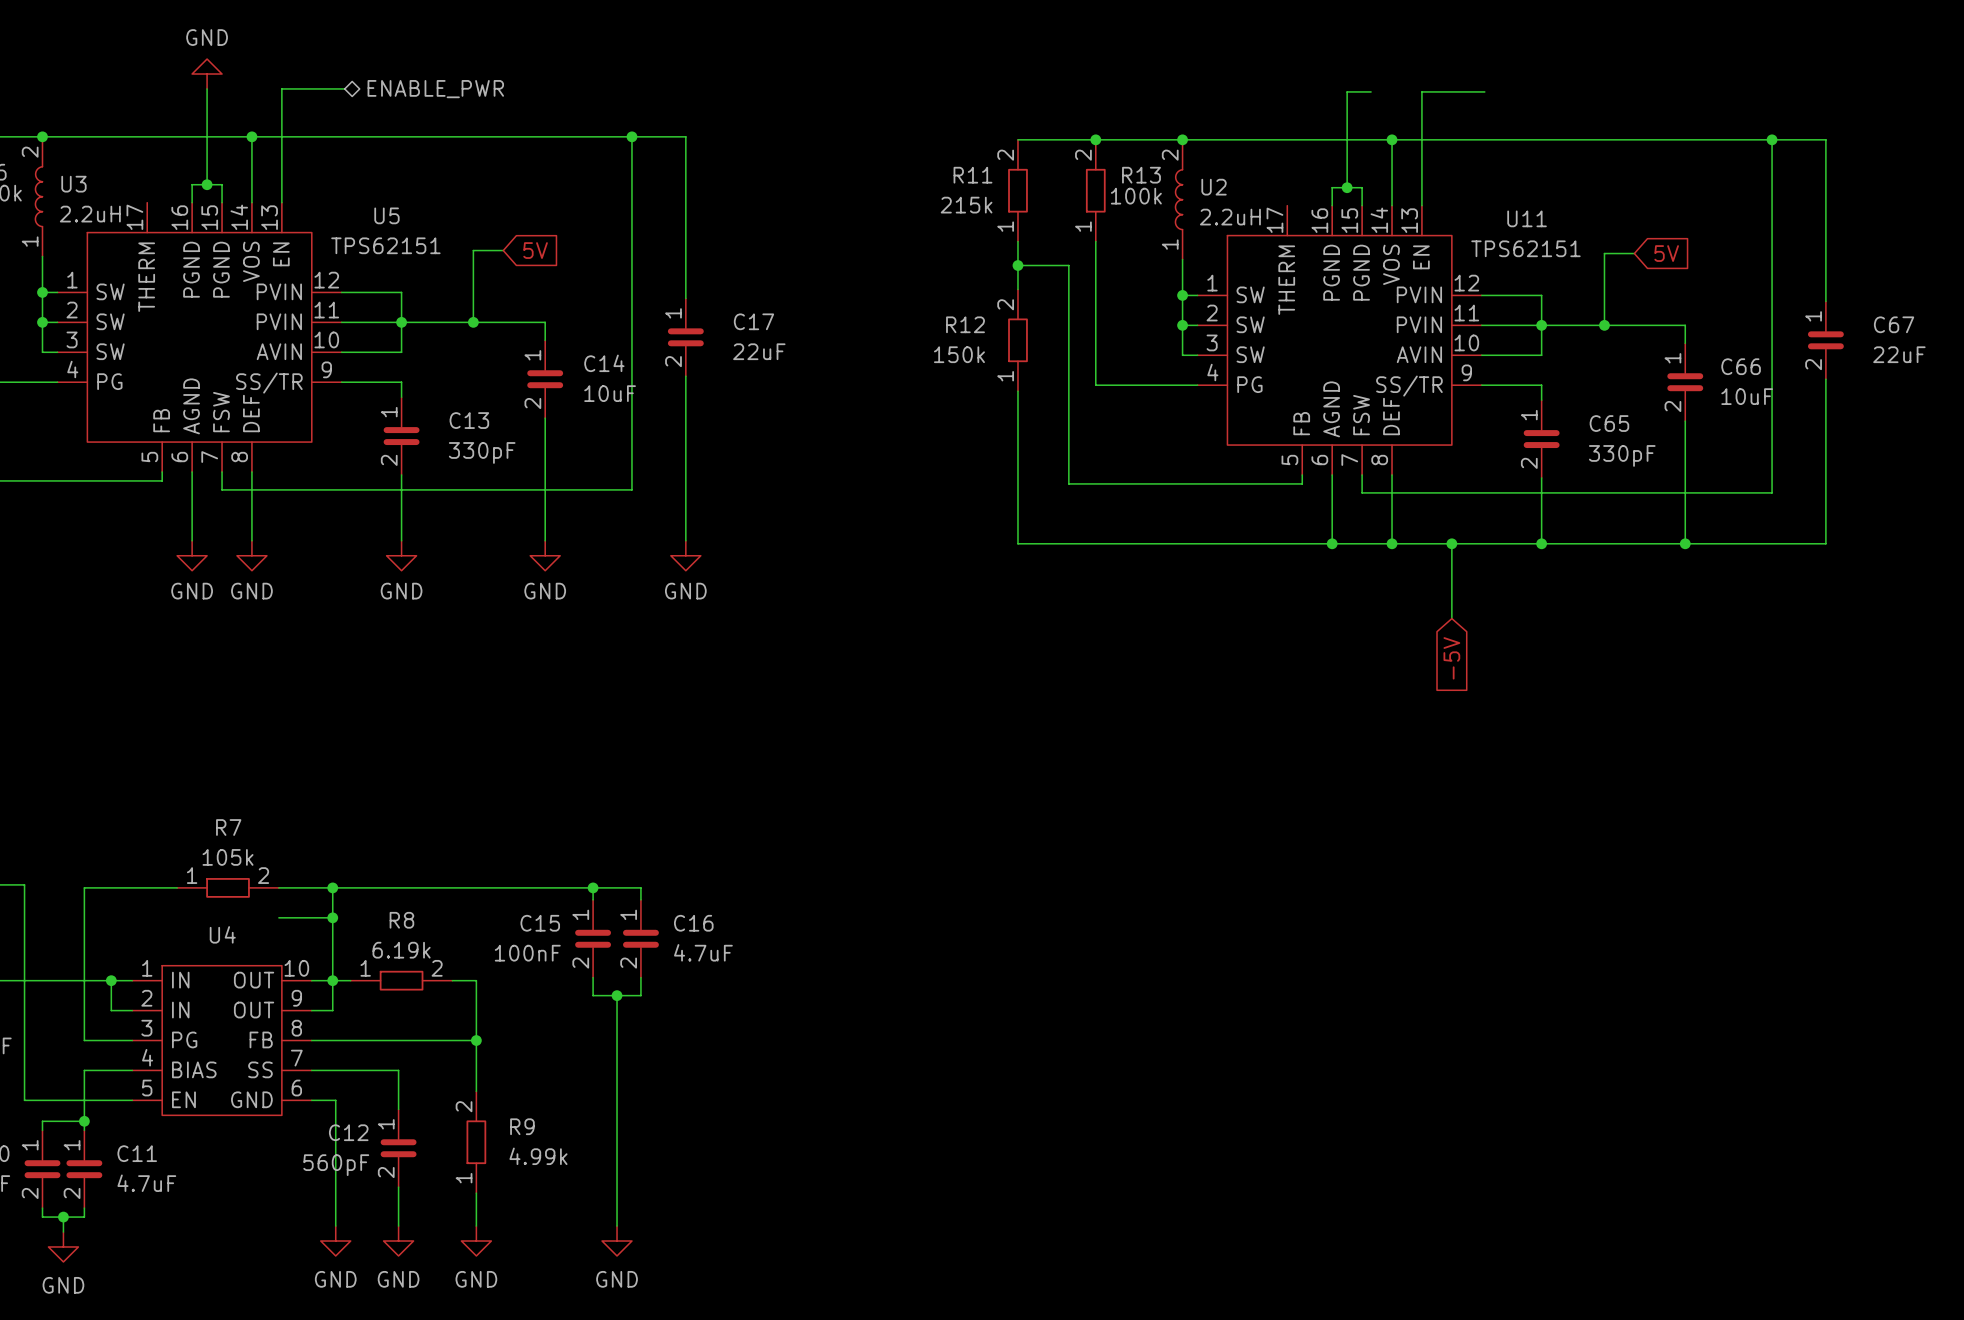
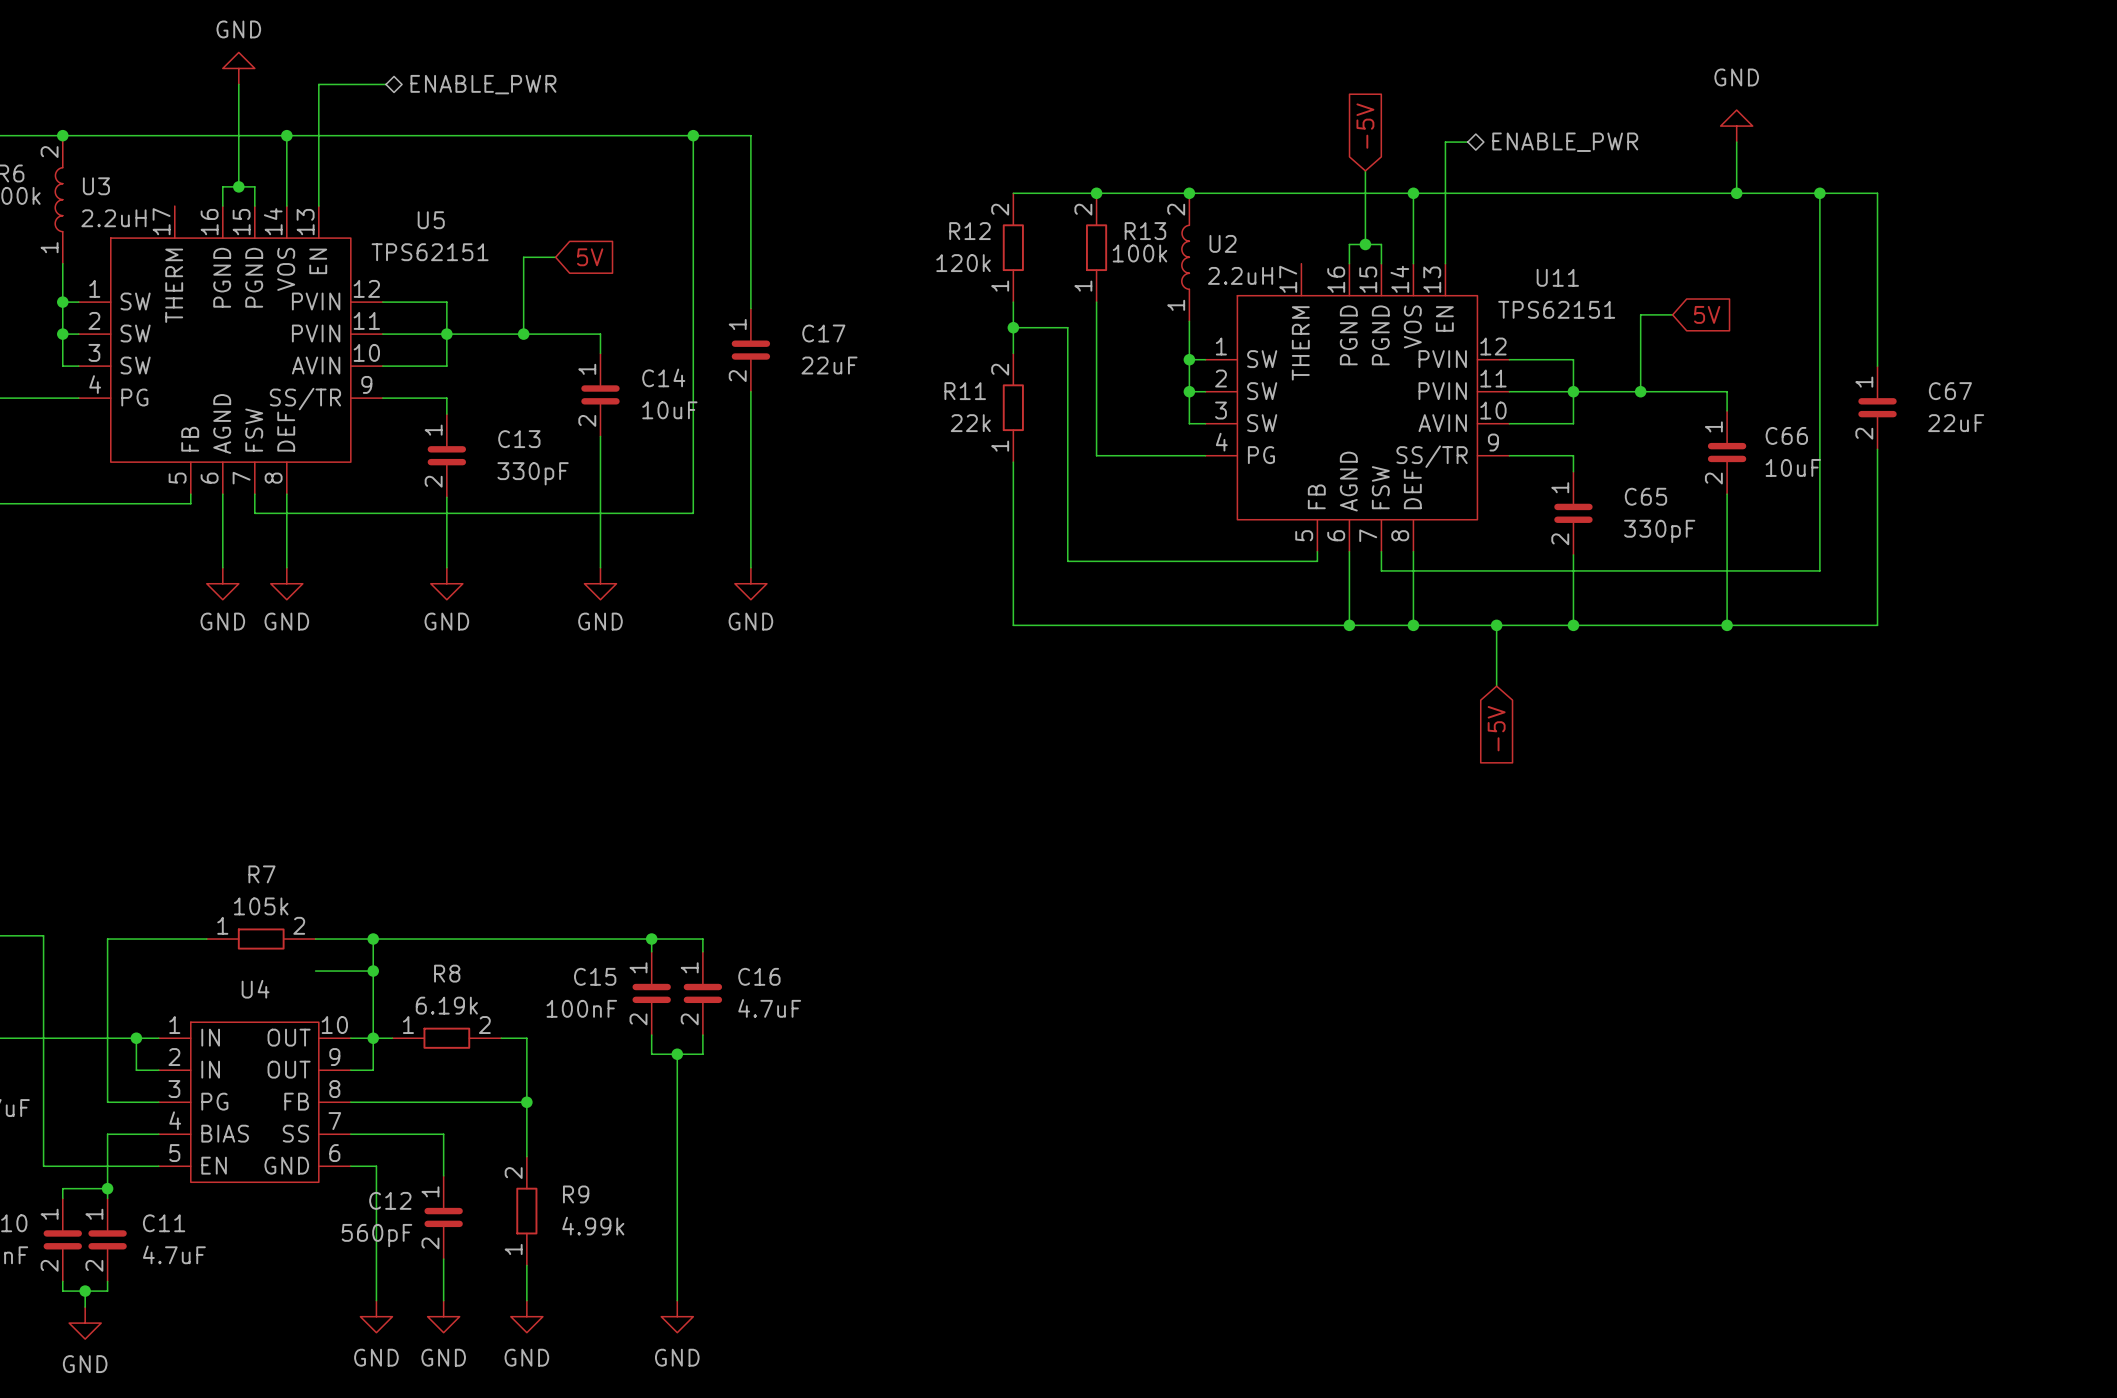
wire: (1371, 91) (1347, 91) (1347, 187) -> none
wire: (1484, 91) (1421, 91) (1421, 205) -> none
global label: none -> -5V (1365, 126)
power symbol: none -> GND (1736, 126)
wire: (1017, 139) (1825, 139) (1825, 301) -> (1013, 193) (1877, 193) (1877, 366)
junction: (1095, 139) -> none
junction: (1182, 139) -> none
wire: (1392, 139) (1392, 205) -> (1413, 193) (1413, 263)
junction: (1392, 139) -> none
wire: (1772, 139) (1772, 492) (1362, 492) (1362, 474) -> none
junction: (1772, 139) -> none
wire: none -> (1467, 142) (1445, 142) (1445, 263)
hierarchical label: none -> ENABLE_PWR (1565, 142)
wire: none -> (1736, 142) (1736, 193)
junction position: (1347, 187) -> (1413, 193)
junction: none -> (1096, 193)
R11 position: (1017, 190) -> (1013, 407)
junction: none -> (1189, 193)
R13 position: (1095, 190) -> (1096, 247)
junction: none -> (1736, 193)
junction: none -> (1819, 193)
U2 position: (1179, 199) -> (1185, 257)
R11 text: 215k (966, 205) -> 22k (970, 423)
wire: (1332, 205) (1332, 187) (1362, 187) (1362, 205) -> (1349, 263) (1349, 244) (1381, 244) (1381, 263)
junction: none -> (1365, 244)
wire: (1017, 241) (1017, 289) -> (1013, 302) (1013, 353)
wire: (1095, 241) (1095, 310) -> (1365, 170) (1365, 244)
wire: (1634, 253) (1604, 253) (1604, 325) -> (1672, 314) (1640, 314) (1640, 391)
global label position: 5V (1666, 253) -> 5V (1707, 314)
wire: (1182, 259) (1182, 355) (1197, 355) -> none
wire: (1017, 265) (1068, 265) (1068, 483) (1302, 483) (1302, 474) -> (1013, 327) (1067, 327) (1067, 561) (1317, 561) (1317, 551)
junction: (1017, 265) -> none
wire: none -> (1096, 302) (1096, 455) (1205, 455)
wire: (1182, 295) (1197, 295) -> (1189, 359) (1205, 359)
junction: (1182, 295) -> none
wire: (1481, 295) (1541, 295) (1541, 355) (1481, 355) -> (1509, 359) (1573, 359) (1573, 423) (1509, 423)
junction: none -> (1013, 327)
R12 name position: R12 (965, 324) -> R12 (970, 231)
wire: (1182, 325) (1197, 325) -> (1189, 391) (1205, 391)
junction: (1182, 325) -> none
wire: (1481, 325) (1685, 325) -> (1819, 193) (1819, 337)
junction: (1541, 325) -> none
junction: (1604, 325) -> none
R12 position: (1017, 340) -> (1013, 247)
U11 position: (1339, 340) -> (1357, 407)
C67 position: (1825, 340) -> (1877, 407)
junction: none -> (1189, 359)
R12 text: 150k (959, 354) -> 120k (963, 263)
junction: none -> (1189, 391)
wire: none -> (1509, 391) (1727, 391) (1727, 410)
junction: none -> (1573, 391)
junction: none -> (1640, 391)
wire: (1825, 379) (1825, 543) (1685, 543) -> none
C66 position: (1685, 382) -> (1727, 452)
wire: (1095, 385) (1197, 385) -> (1189, 401) (1189, 423) (1205, 423)
wire: (1481, 385) (1541, 385) (1541, 400) -> (1509, 455) (1573, 455) (1573, 471)
wire: (1017, 391) (1017, 543) (1275, 543) -> (1381, 551) (1381, 570)
wire: none -> (1877, 449) (1877, 625) (1013, 625) (1013, 462)
C65 position: (1541, 439) -> (1573, 513)
wire: none -> (1727, 494) (1727, 625)
wire: (1332, 474) (1332, 543) -> (1349, 551) (1349, 625)
wire: (1392, 474) (1392, 543) -> (1413, 551) (1413, 625)
wire: (1541, 477) (1541, 543) -> (1573, 554) (1573, 625)
junction: (1332, 543) -> none
junction: (1392, 543) -> none
wire: (1451, 543) (1451, 618) -> none
junction: (1451, 543) -> none
junction: (1541, 543) -> none
junction: (1685, 543) -> none
junction: none -> (1349, 625)
junction: none -> (1413, 625)
wire: none -> (1496, 625) (1496, 686)
junction: none -> (1496, 625)
junction: none -> (1573, 625)
junction: none -> (1727, 625)
global label position: -5V (1451, 658) -> -5V (1496, 728)

